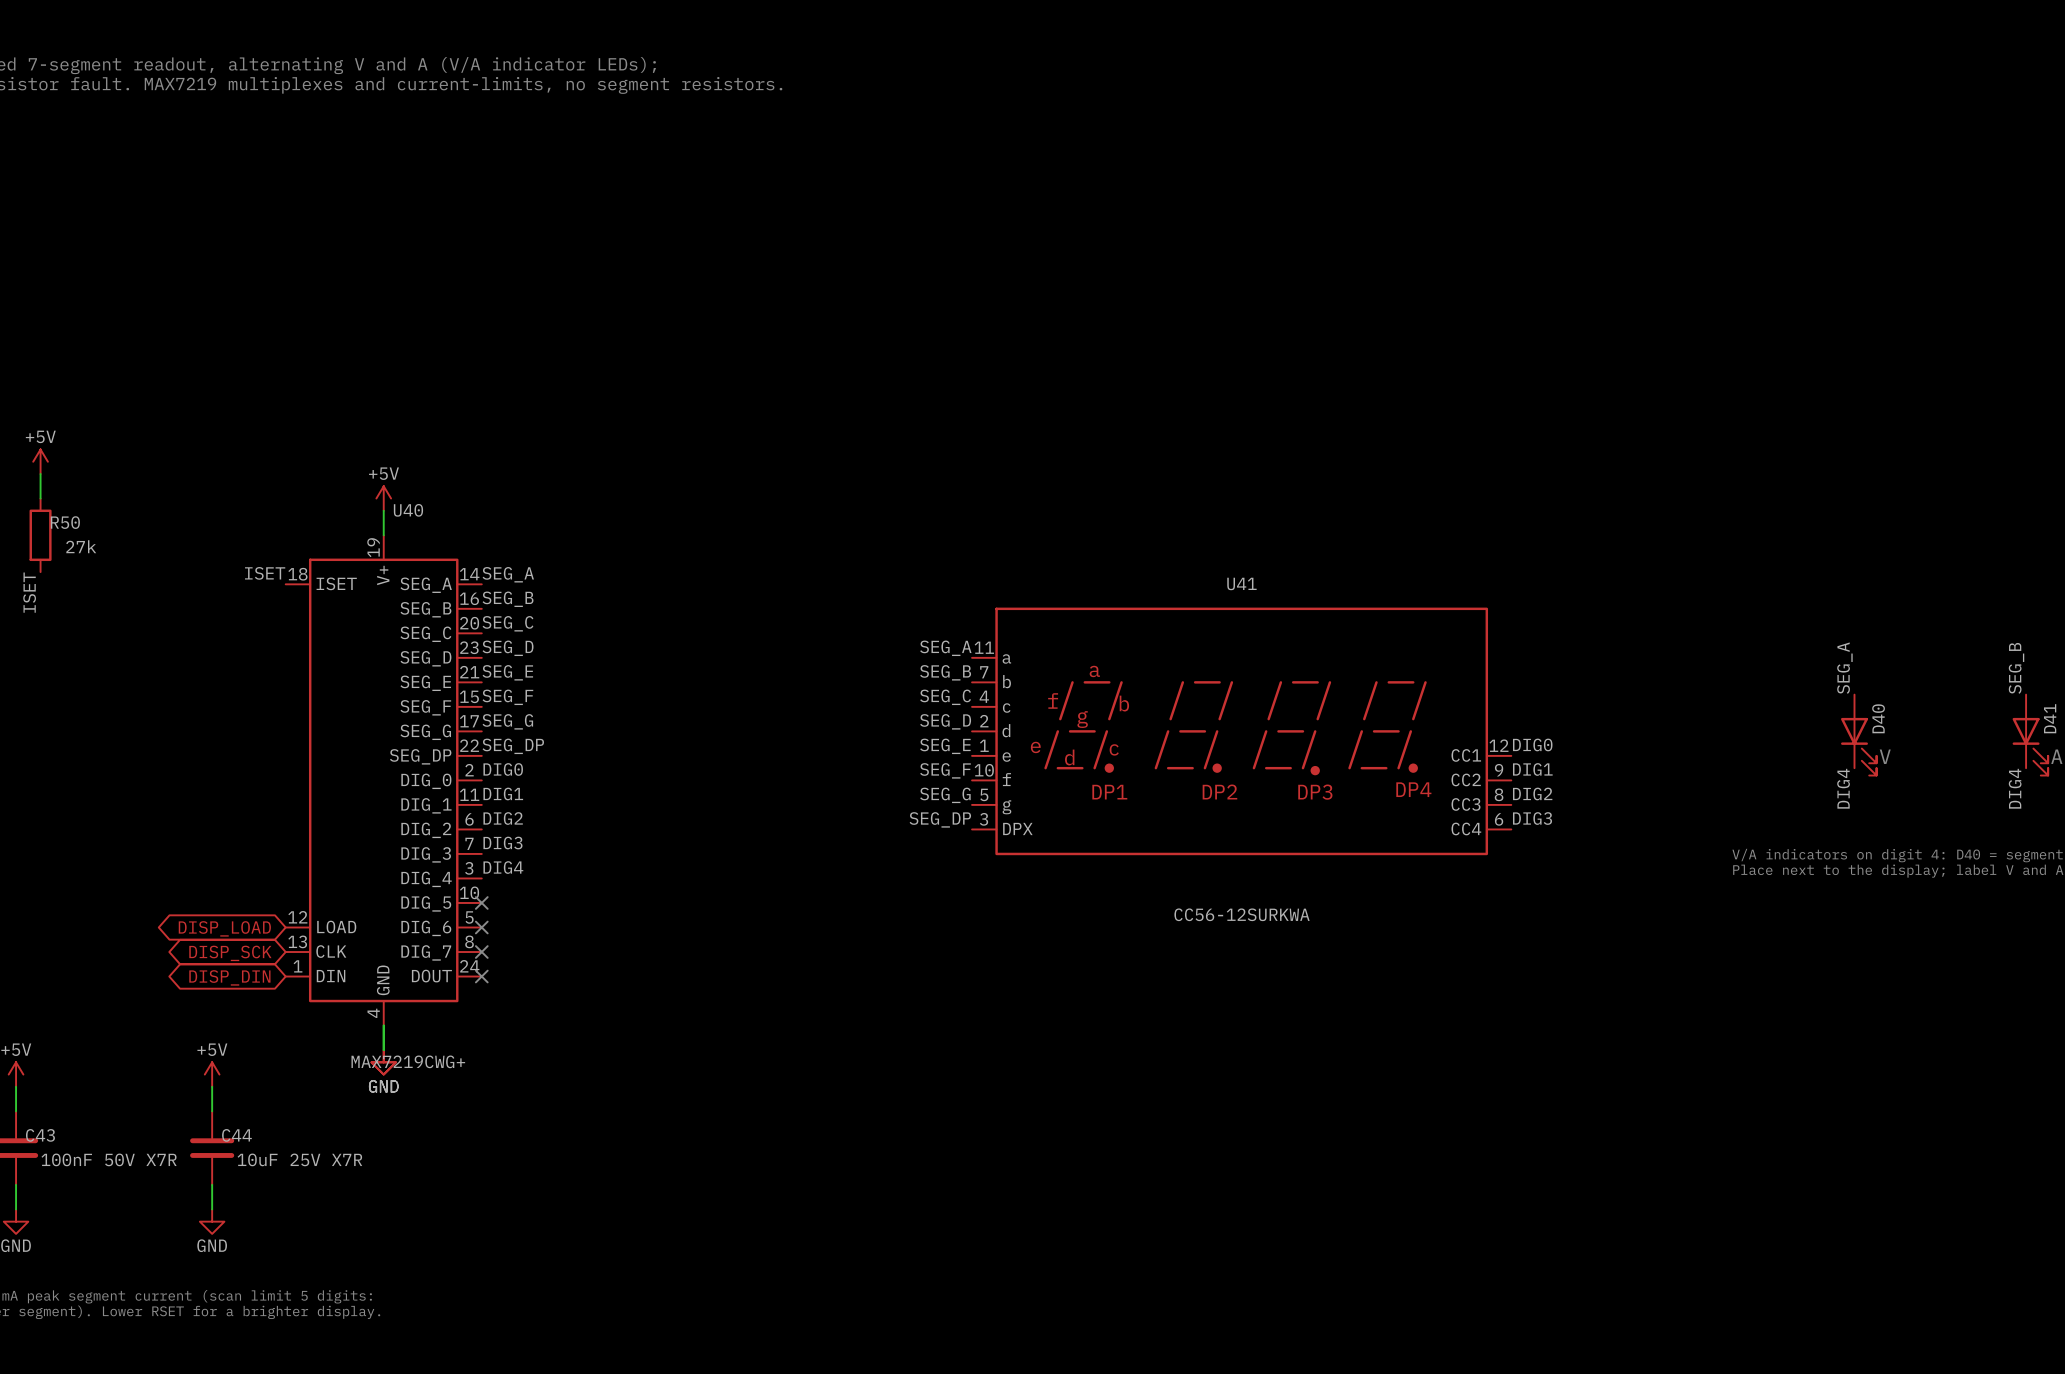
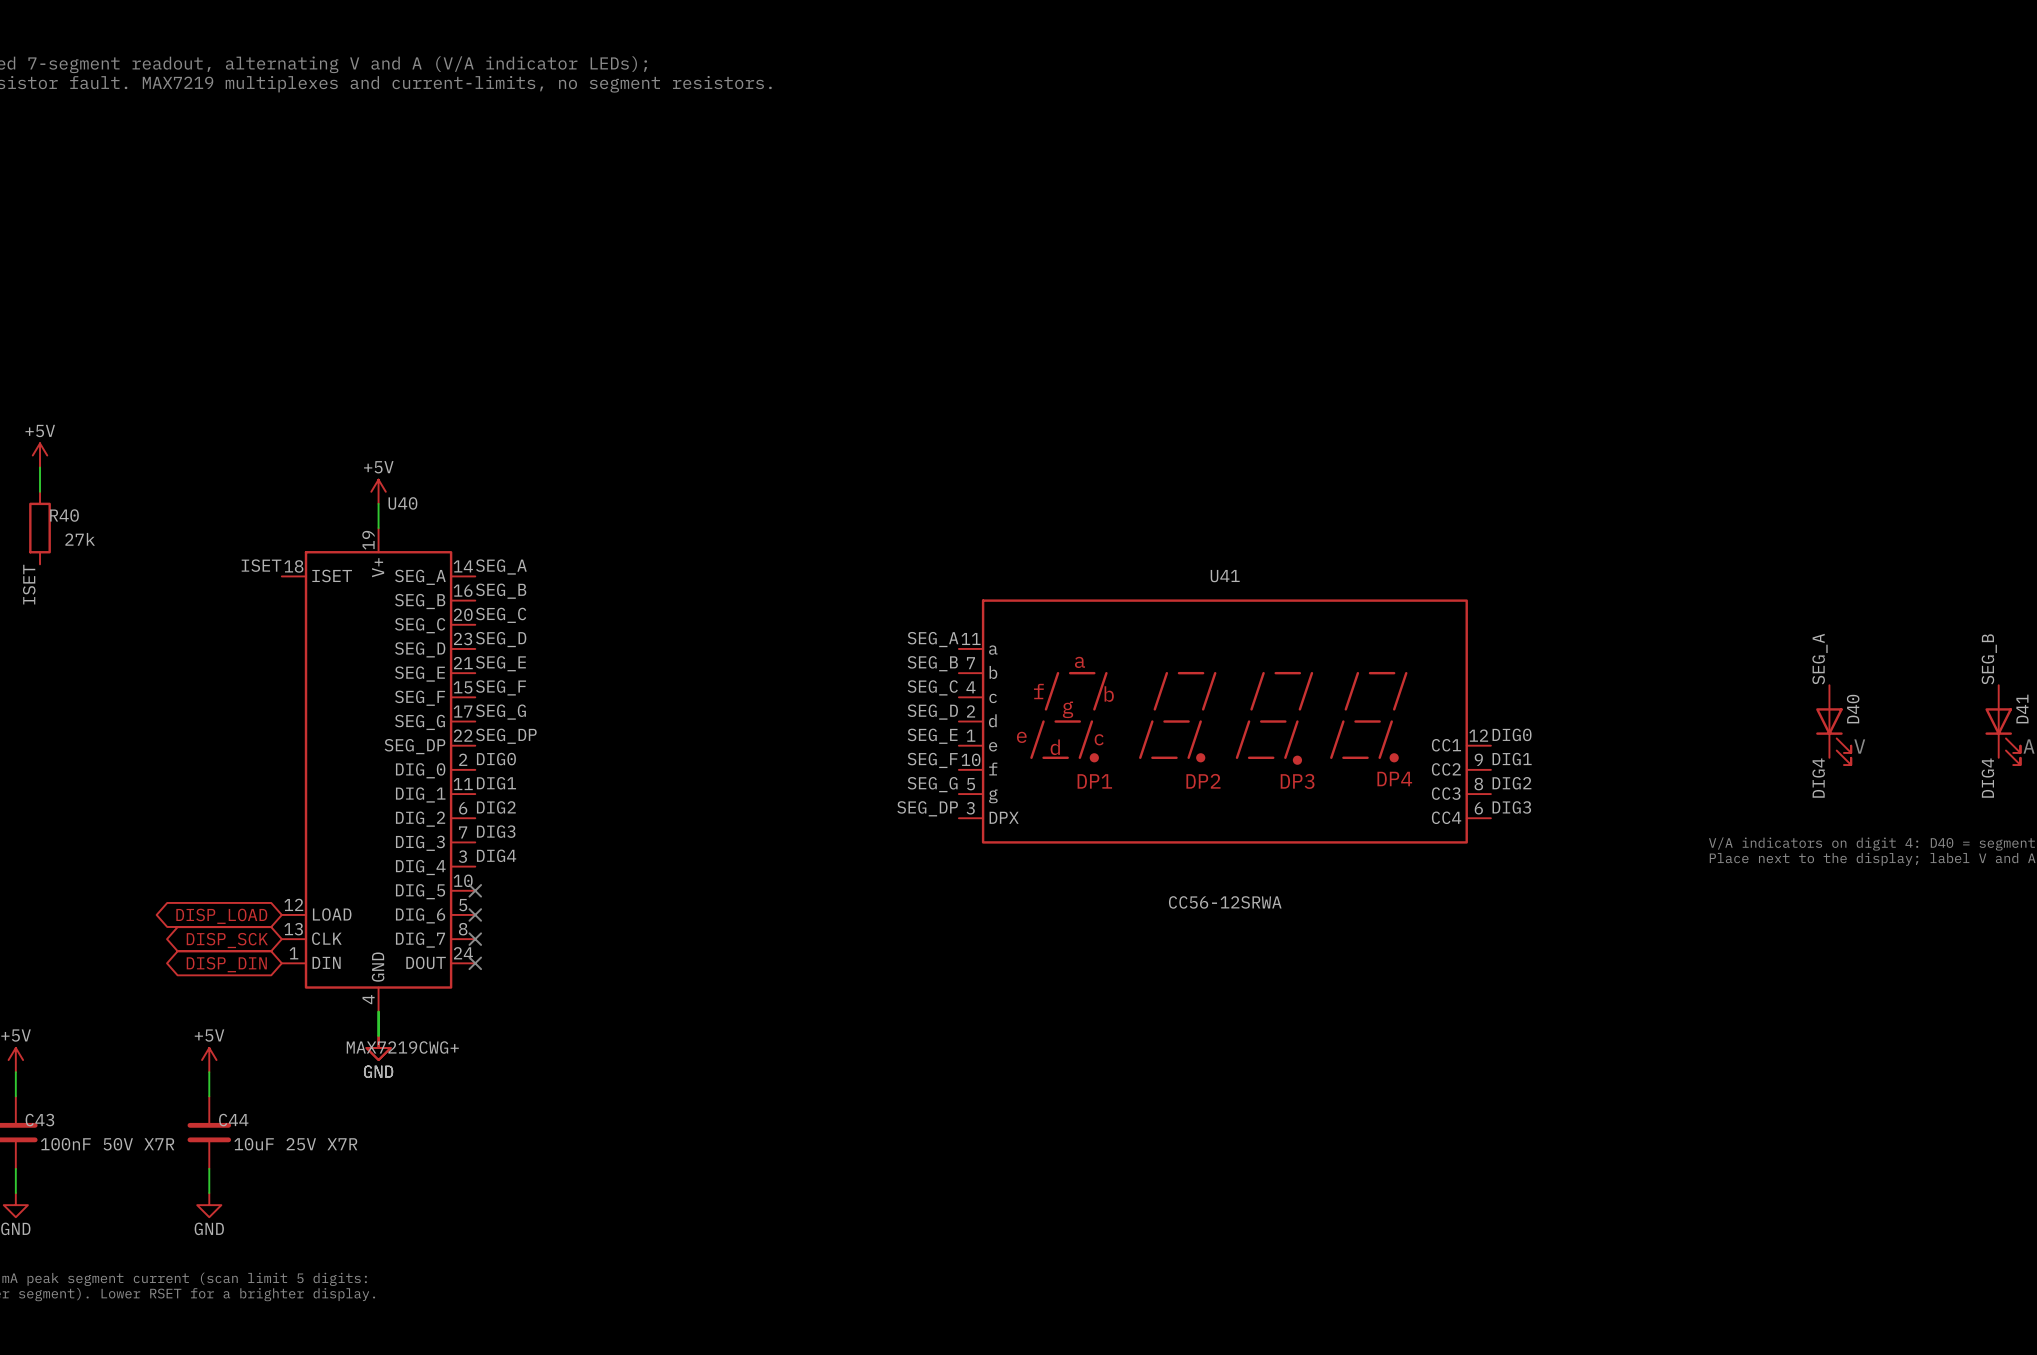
R50 name: R50 (65, 522) -> R40 (64, 515)
U41 value: CC56-12SURKWA (1242, 914) -> CC56-12SRWA (1225, 902)

